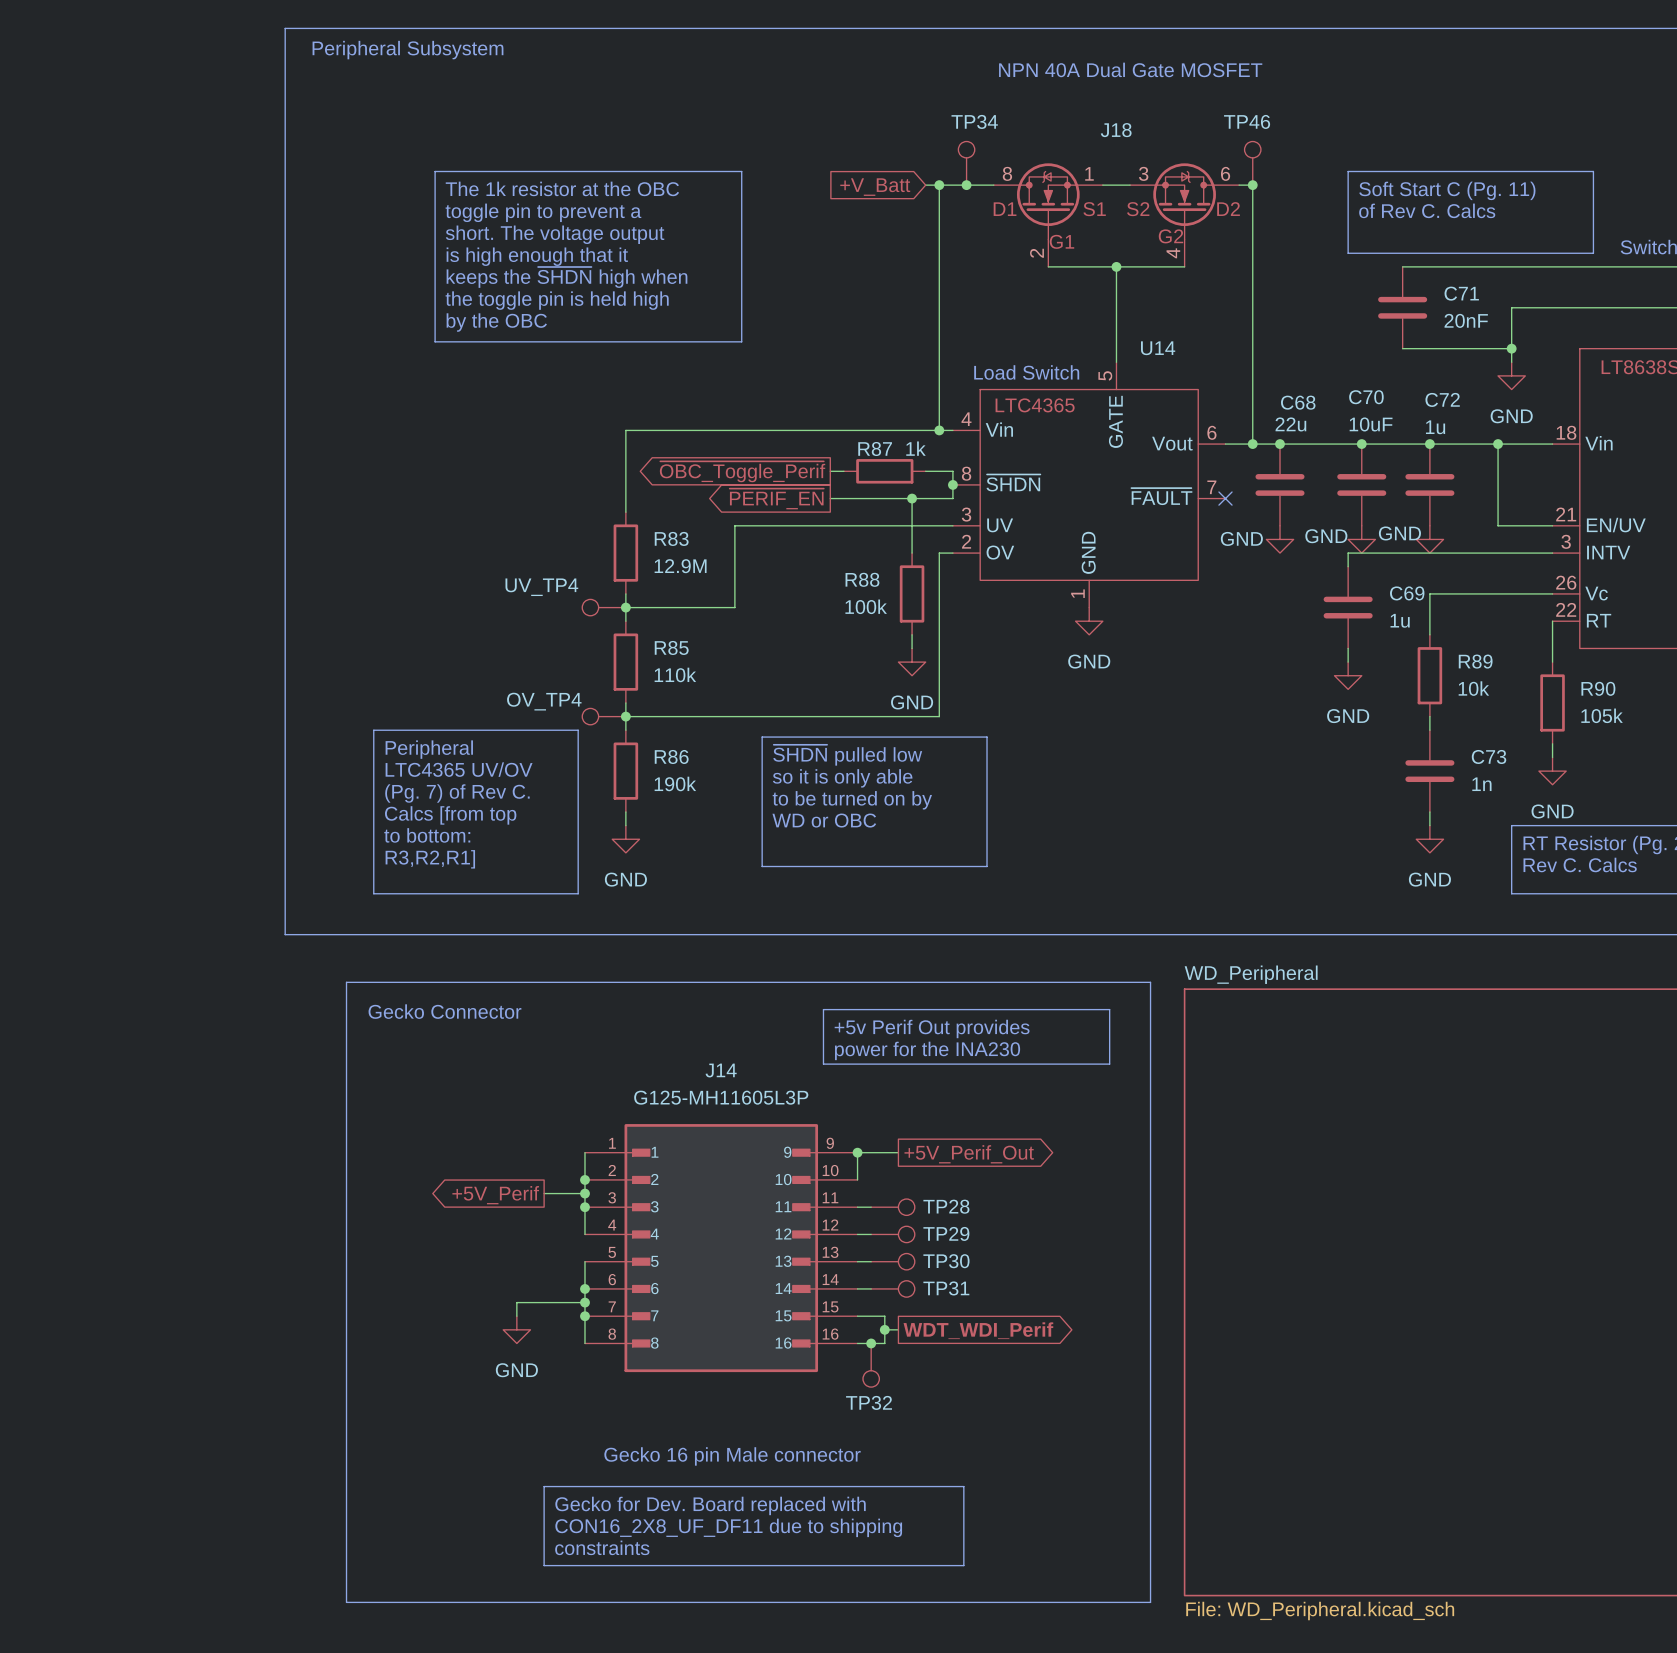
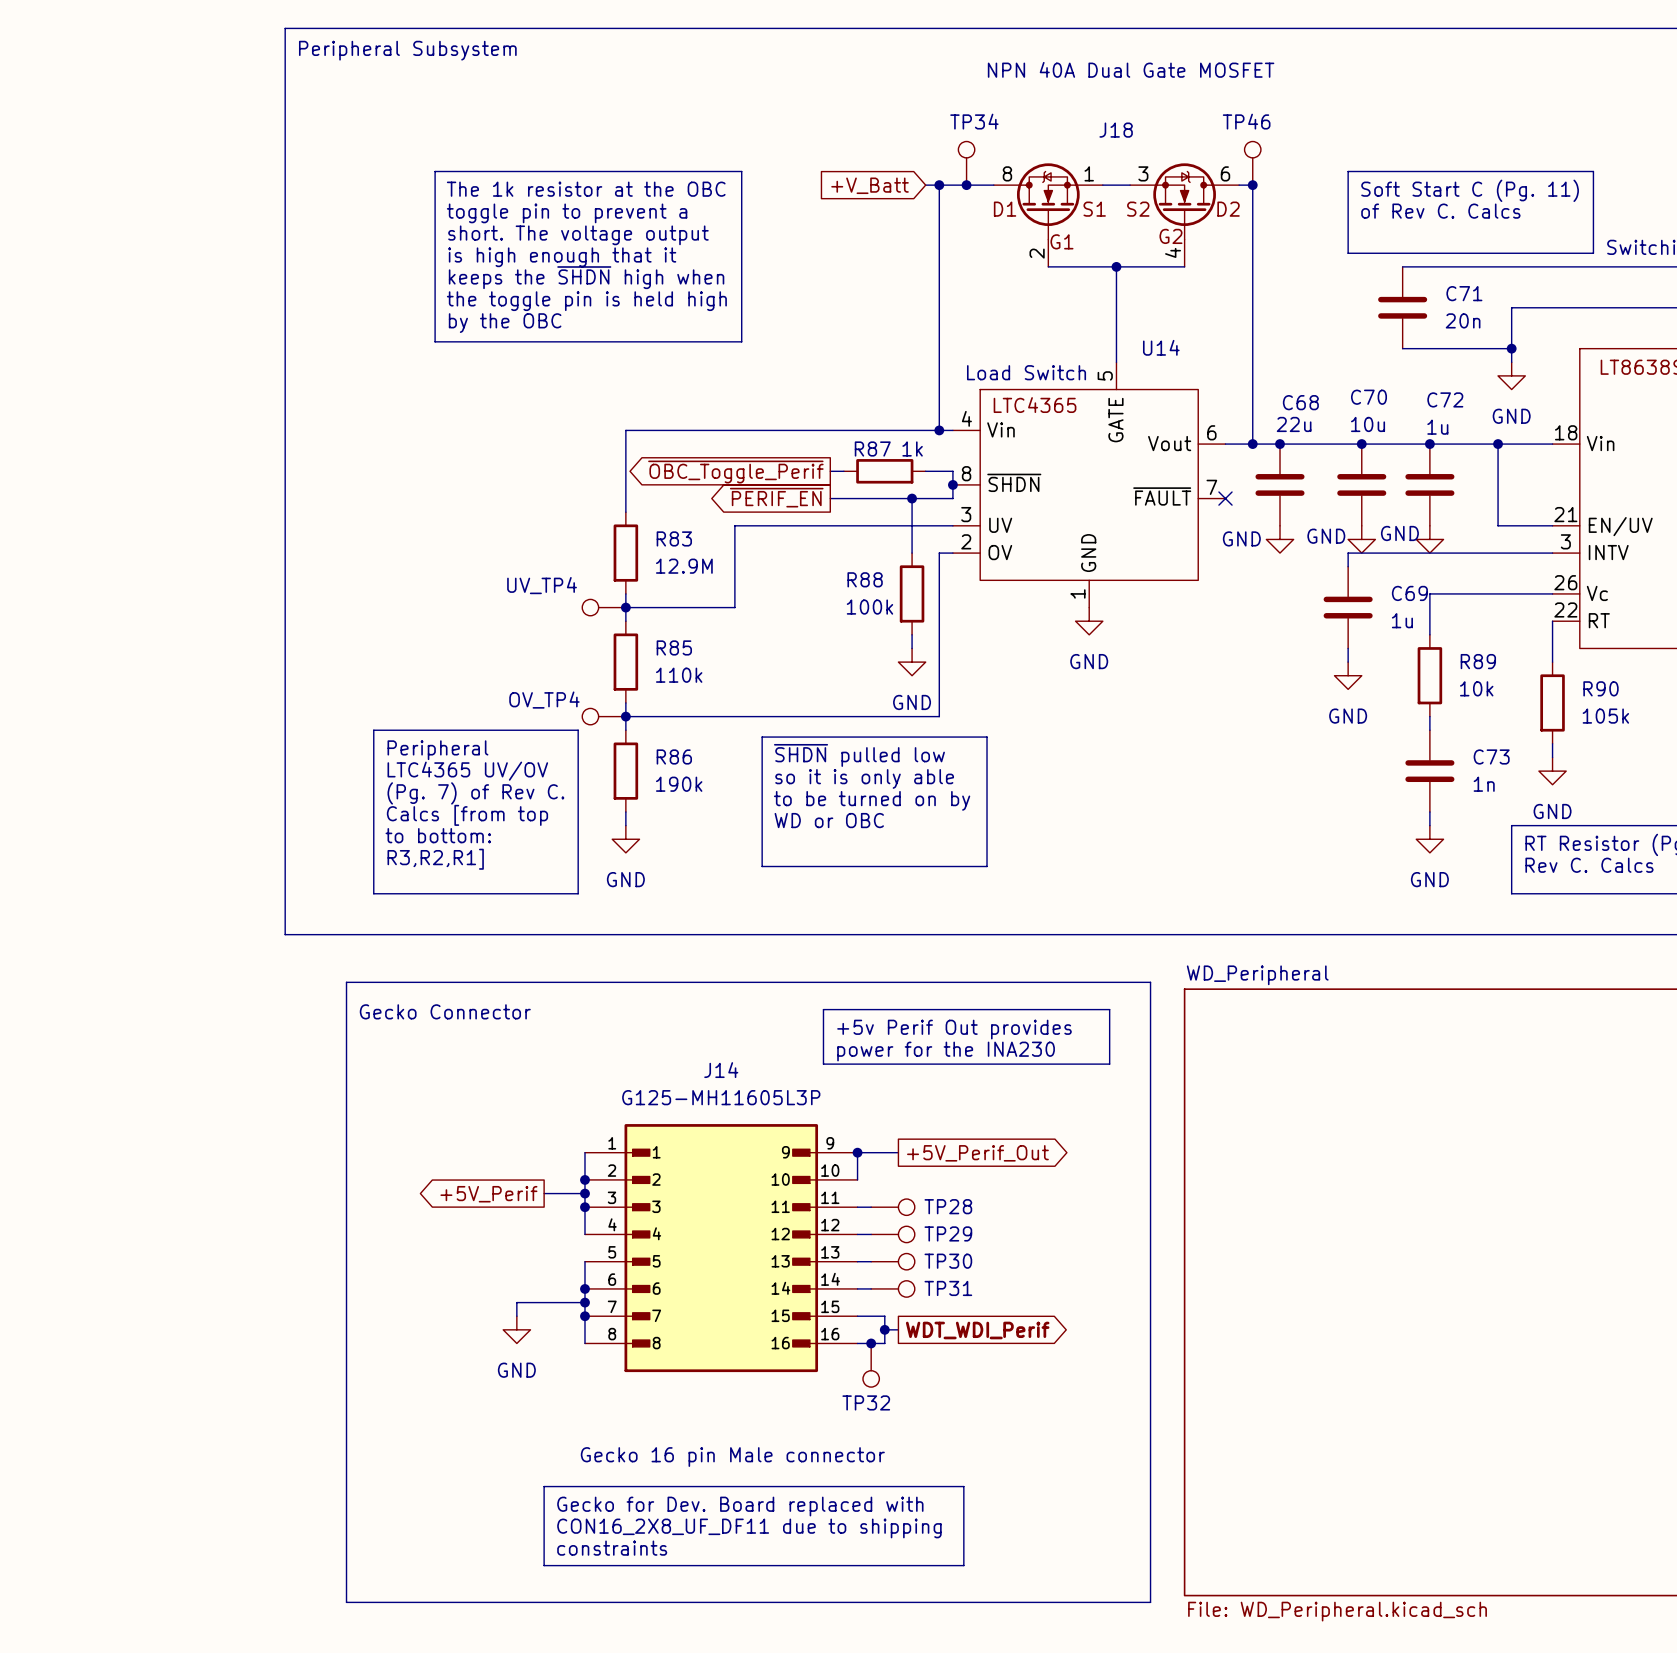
C71 value: 20nF (1466, 320) -> 20n (1463, 320)
C70 value: 10uF (1371, 424) -> 10u (1368, 424)

